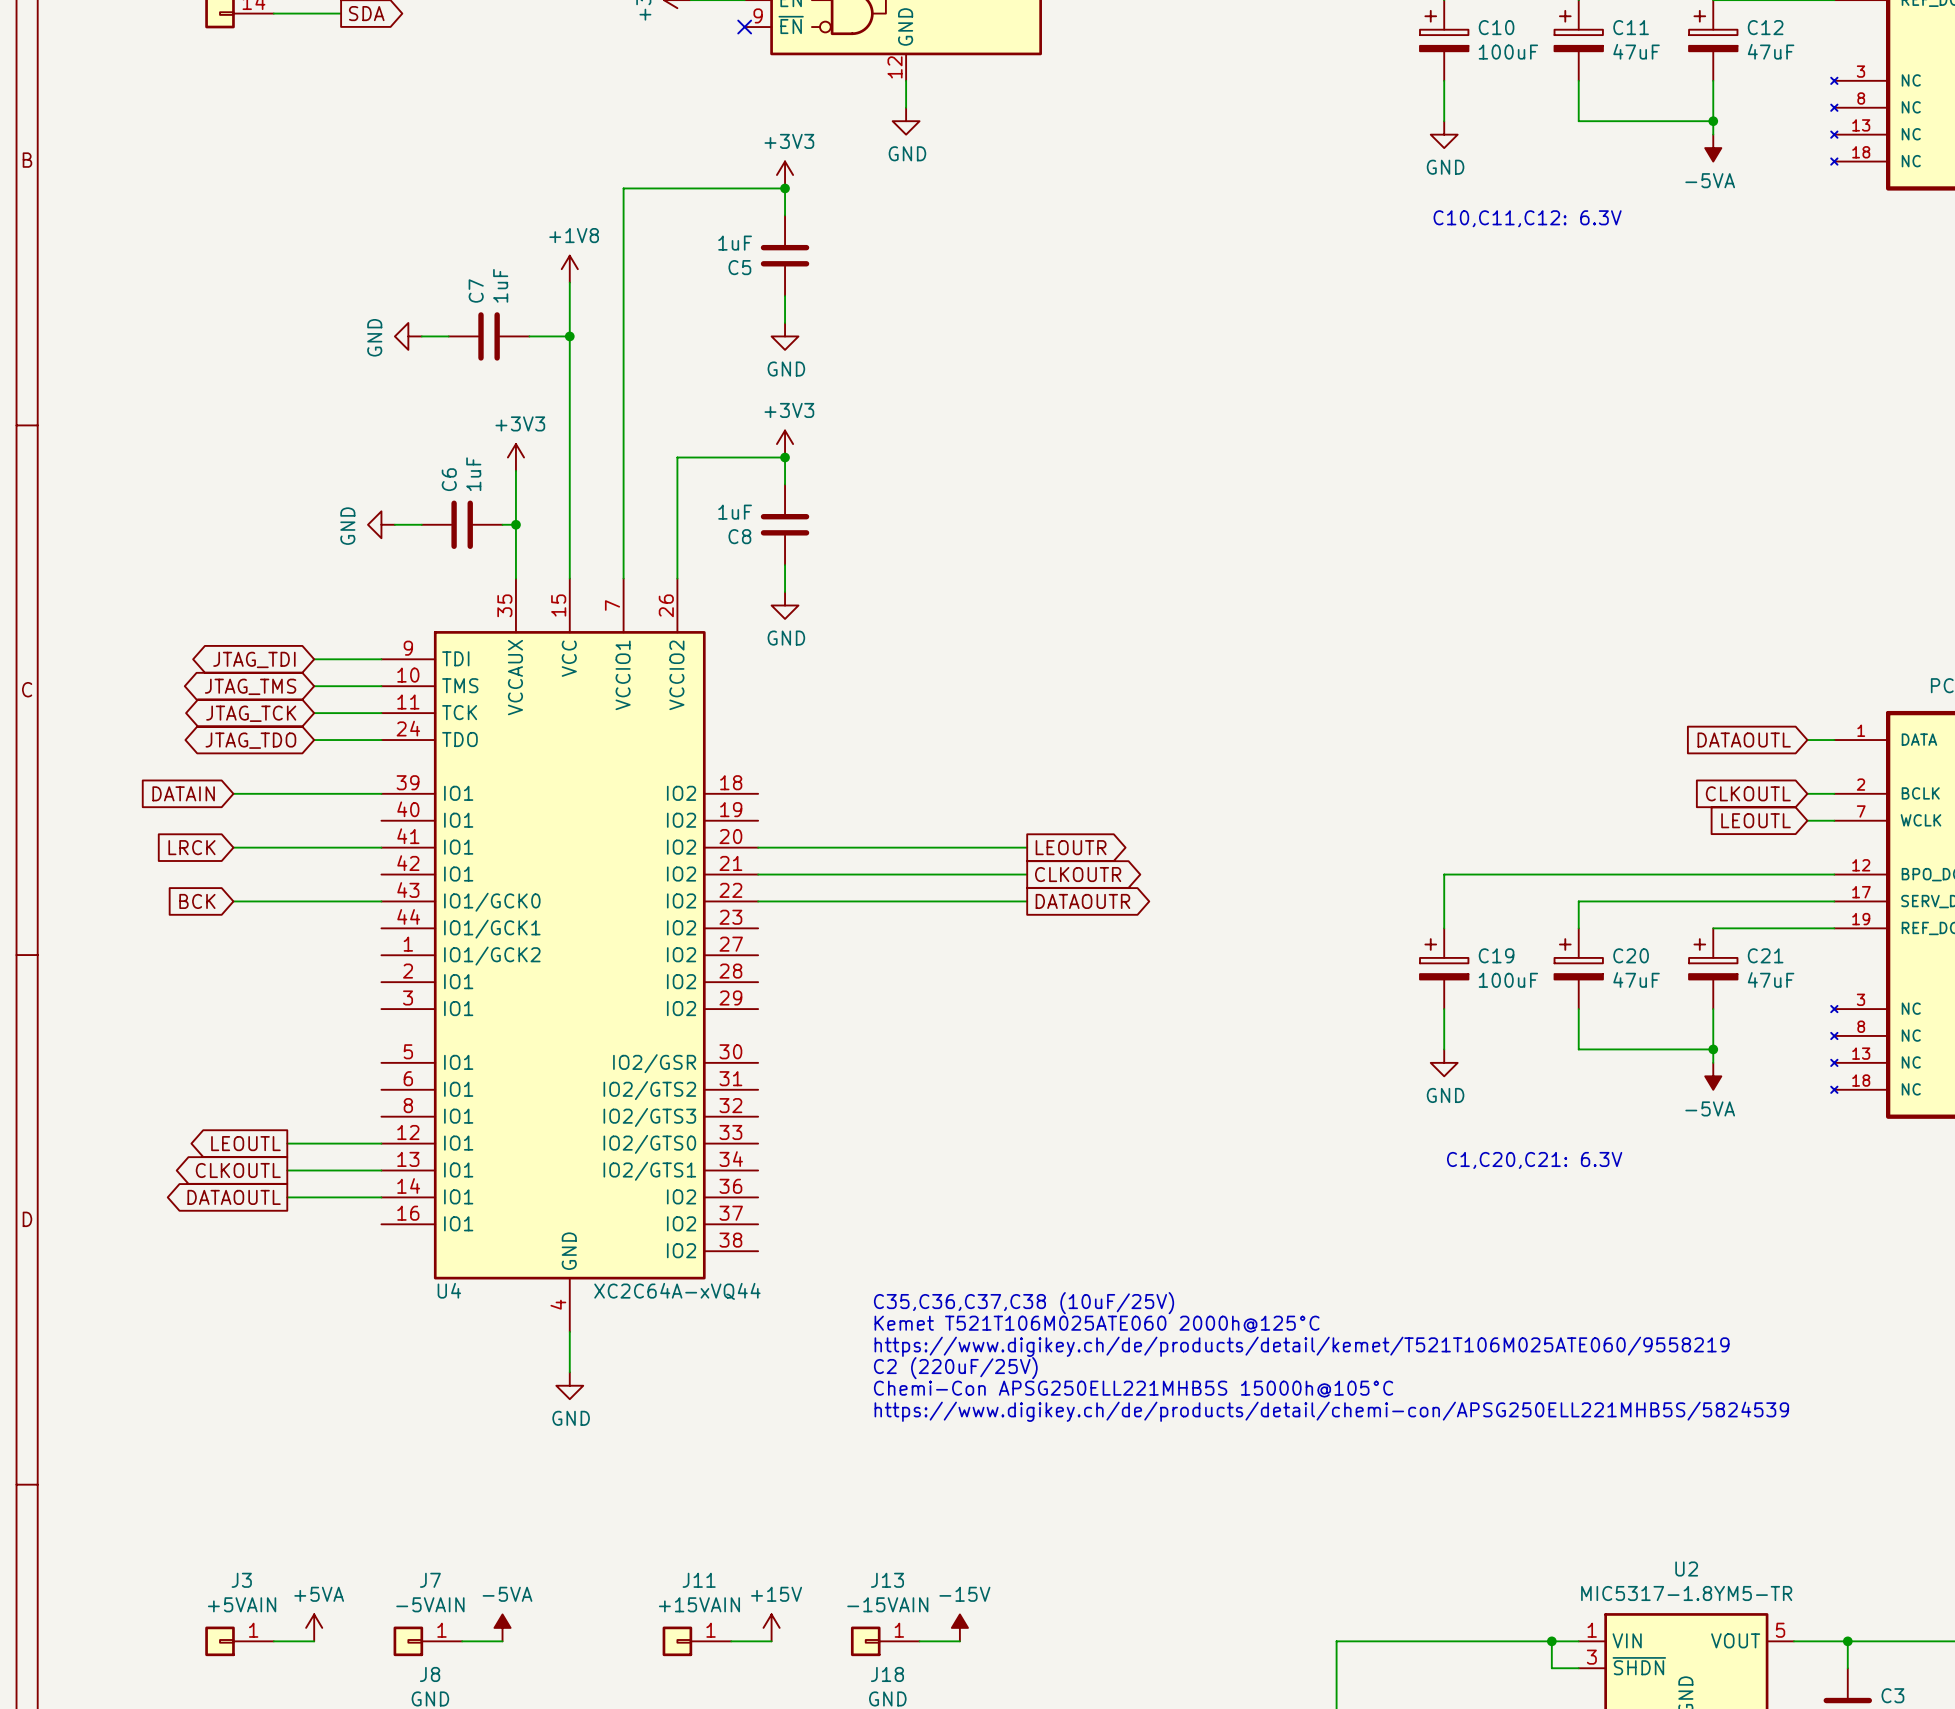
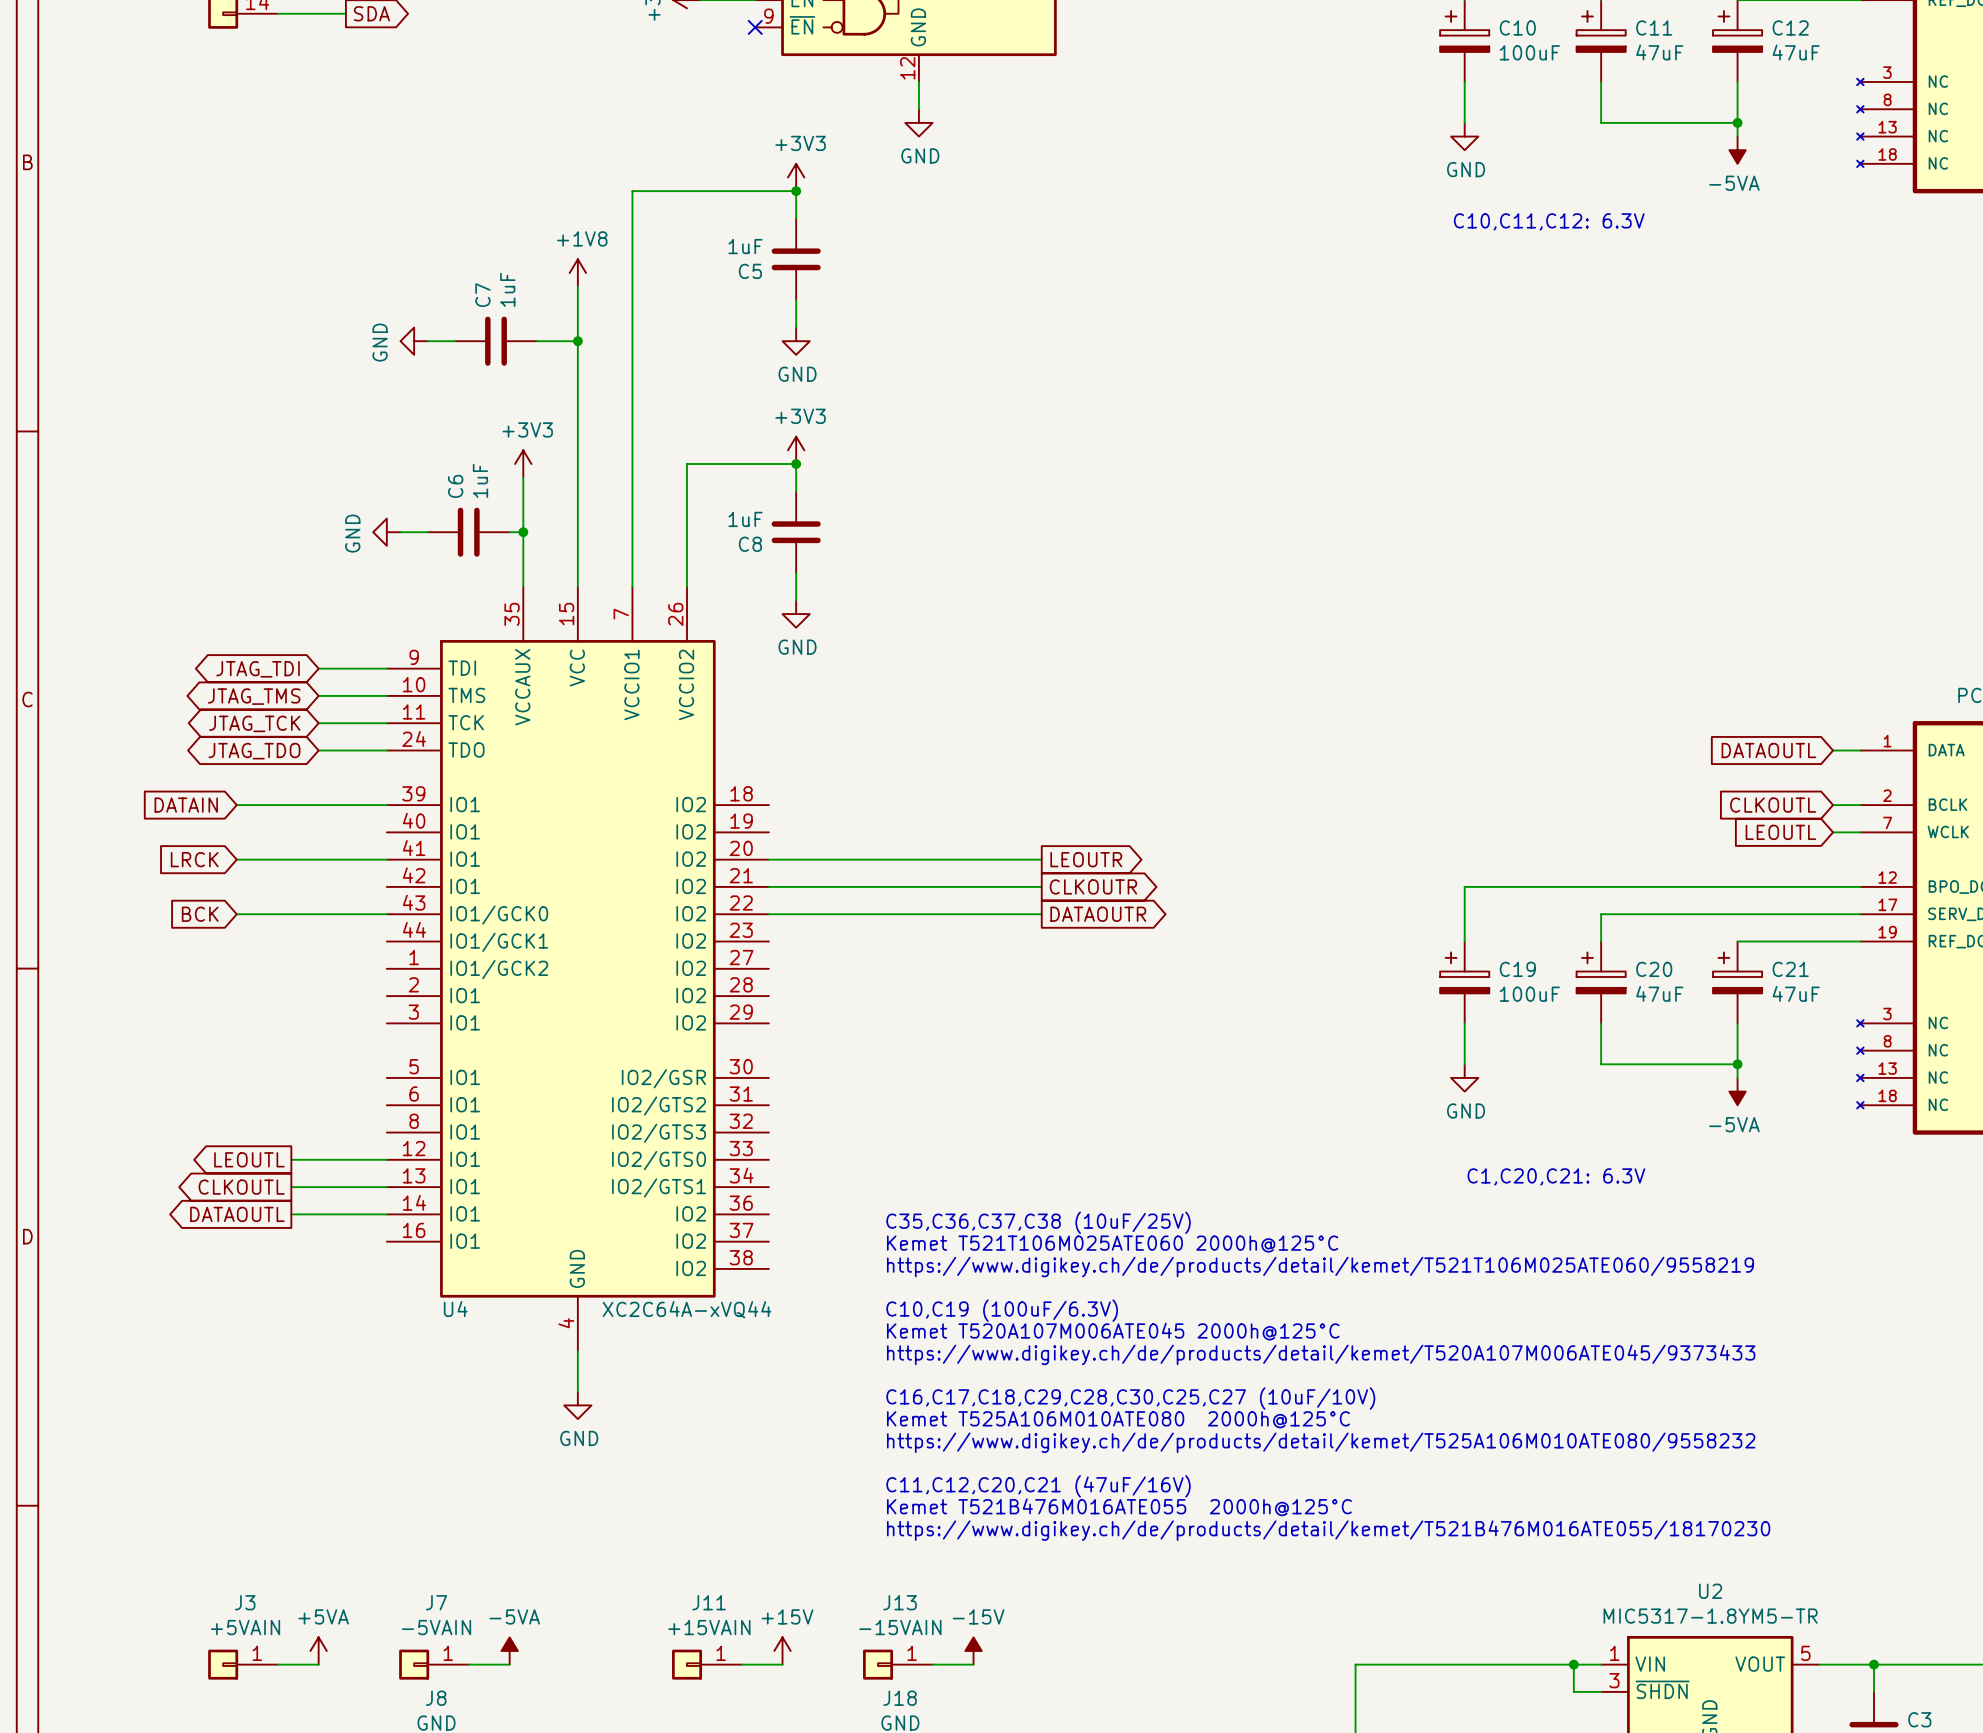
text: none -> C10,C19 (100uF/6.3V) (1002, 1310)
text position: C35,C36,C37,C38 (10uF/25V) (1024, 1303) -> C35,C36,C37,C38 (10uF/25V) (1038, 1222)
text: none -> Kemet T520A107M006ATE045 2000h@125°C (1113, 1331)
text position: Kemet T521T106M025ATE060 2000h@125°C (1097, 1324) -> Kemet T521T106M025ATE060 2000h@125°C (1112, 1244)
text: none -> https://www.digikey.ch/de/products/detail/kemet/T520A107M006ATE045/9373433 (1321, 1354)
text position: https://www.digikey.ch/de/products/detail/kemet/T521T106M025ATE060/9558219 (1302, 1346) -> https://www.digikey.ch/de/products/detail/kemet/T521T106M025ATE060/9558219 (1320, 1267)
text: C2 (220uF/25V) (955, 1368) -> none
text: none -> C16,C17,C18,C29,C28,C30,C25,C27 (10uF/10V) (1130, 1398)
text: Chemi-Con APSG250ELL221MHB5S 15000h@105°C (1133, 1389) -> none
text: none -> Kemet T525A106M010ATE080 2000h@125°C (1118, 1419)
text: https://www.digikey.ch/de/products/detail/chemi-con/APSG250ELL221MHB5S/5824539 (1331, 1411) -> https://www.digikey.ch/de/products/detail/kemet/T525A106M010ATE080/9558232 (1321, 1442)
text: none -> C11,C12,C20,C21 (47uF/16V) (1038, 1486)
text: none -> Kemet T521B476M016ATE055 2000h@125°C (1119, 1507)
text: none -> https://www.digikey.ch/de/products/detail/kemet/T521B476M016ATE055/18170230 (1328, 1530)

